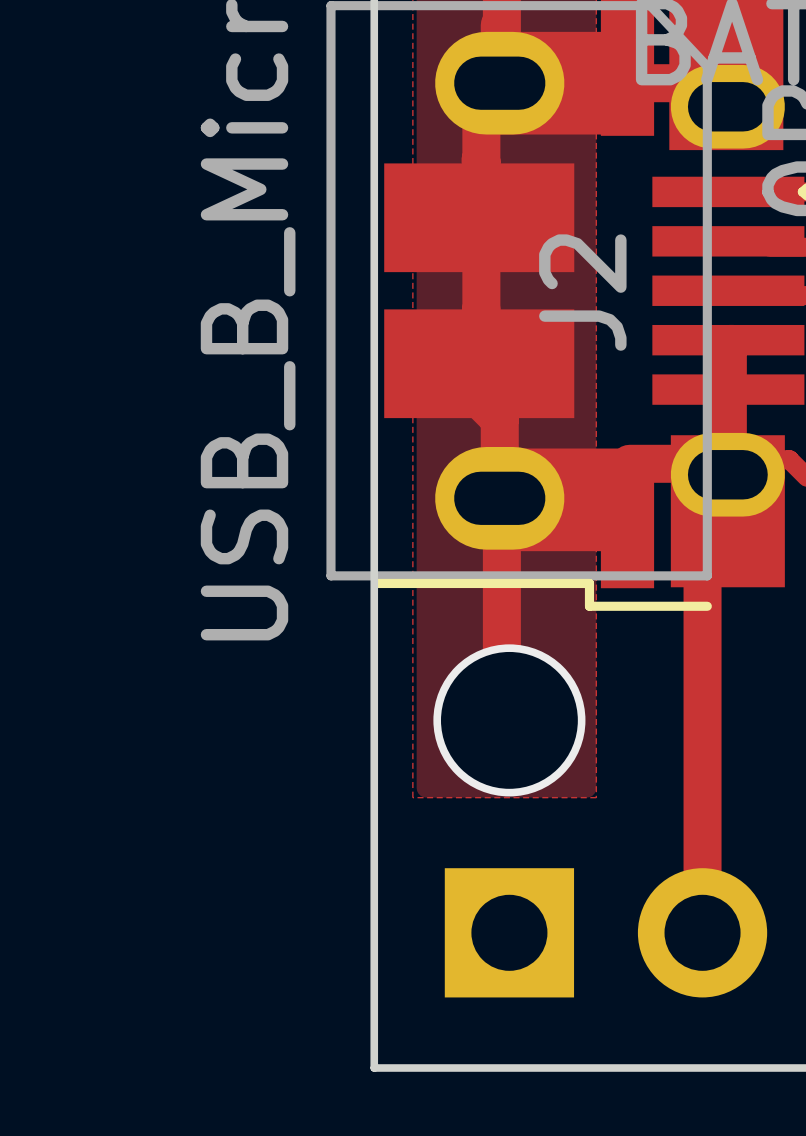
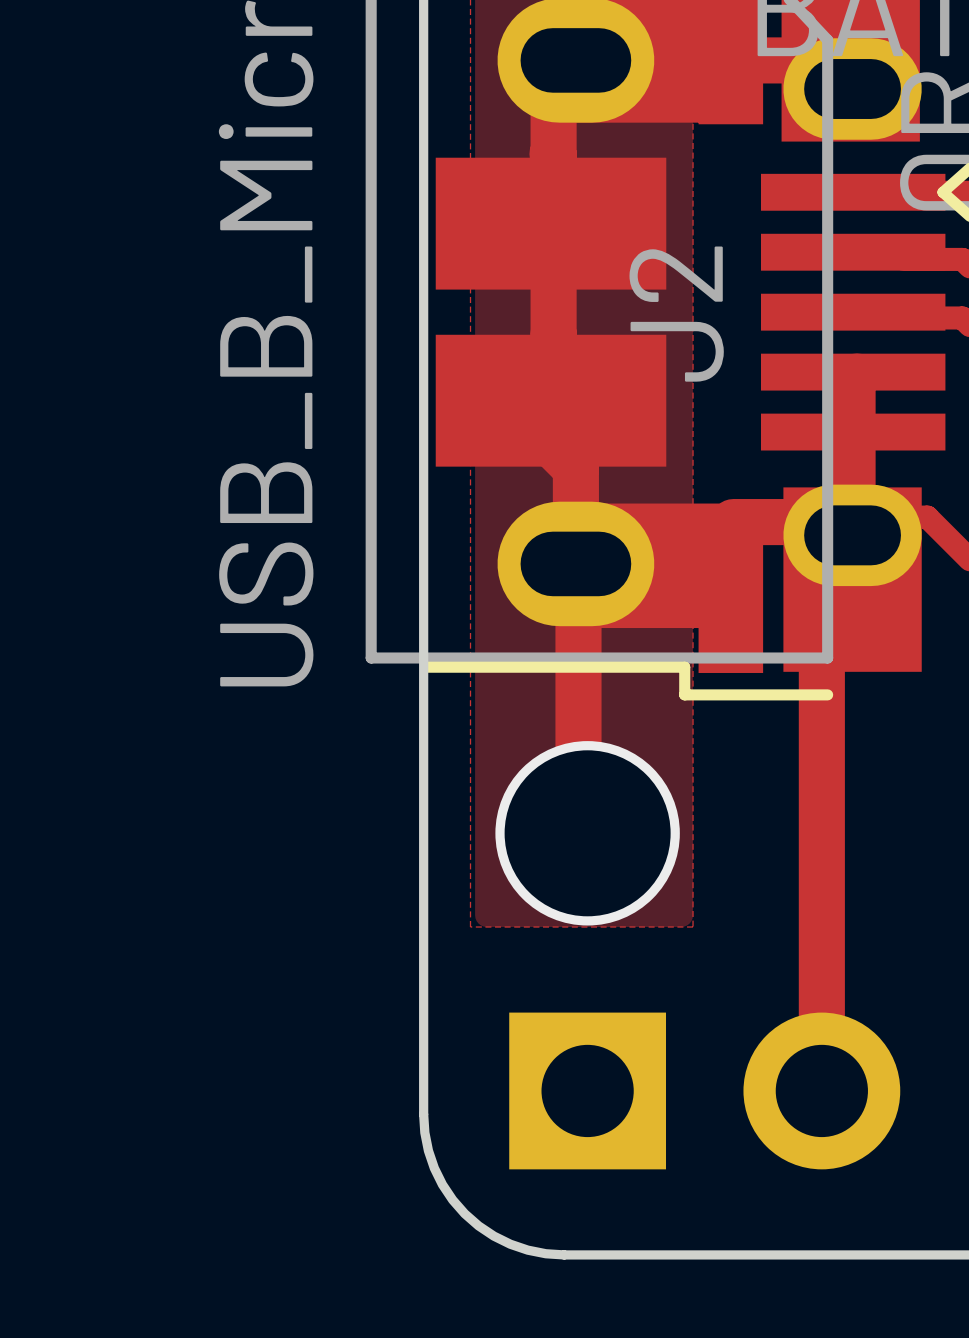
board edge: (374, 952) (374, 1068) (490, 1068) -> (423, 1114) (428, 1150) (434, 1168) (452, 1199) (464, 1213) (493, 1236) (510, 1244) (545, 1253) (564, 1254)

